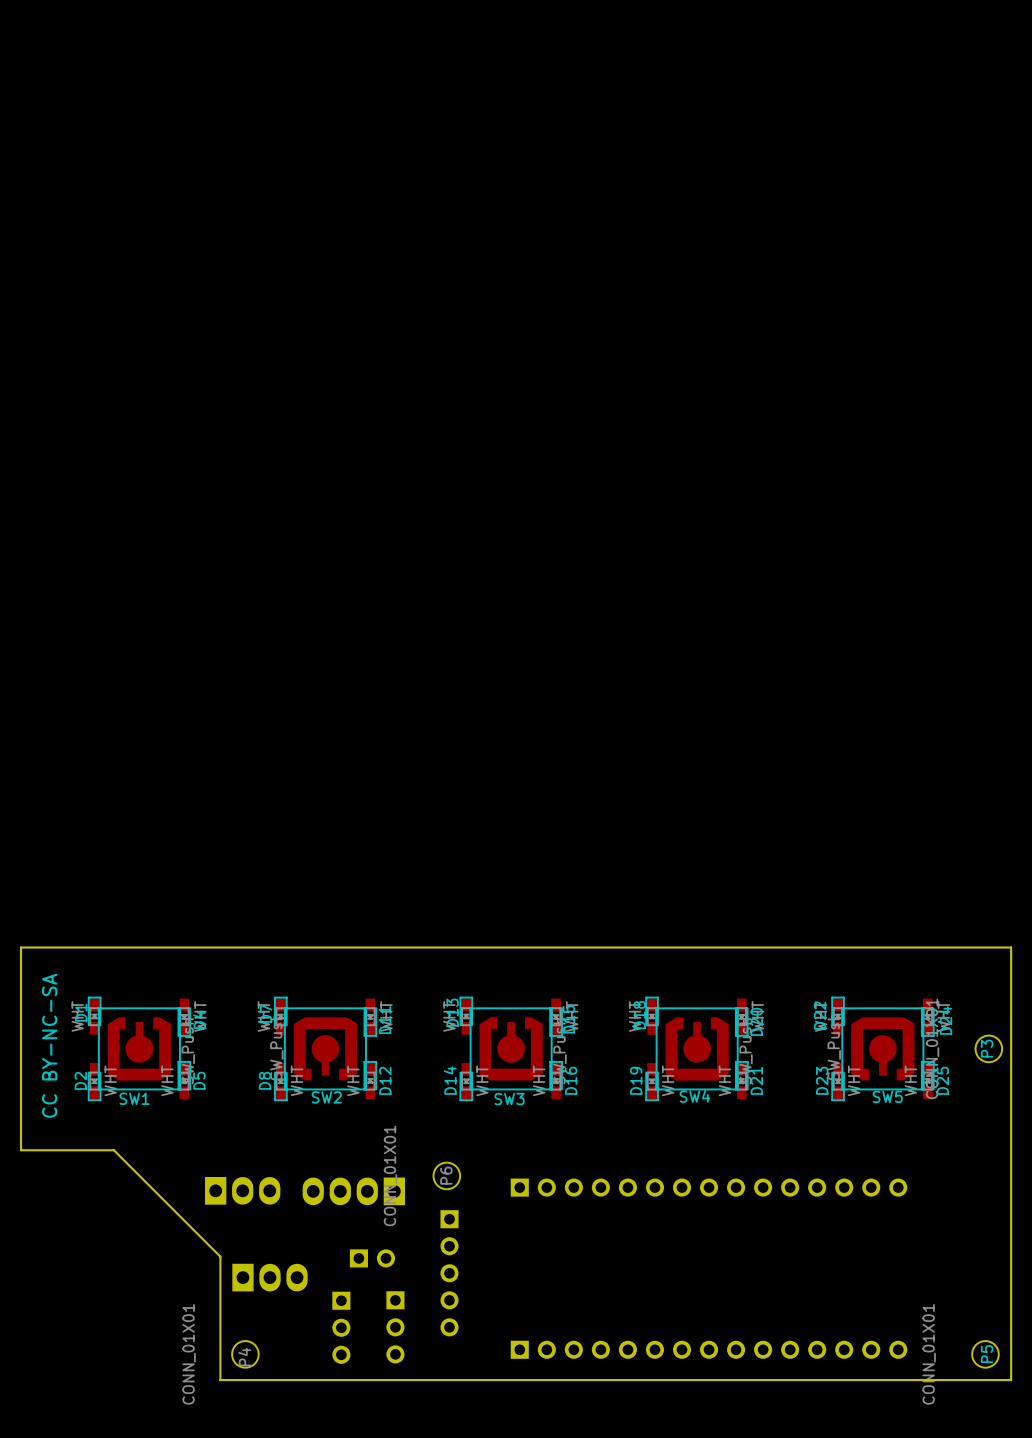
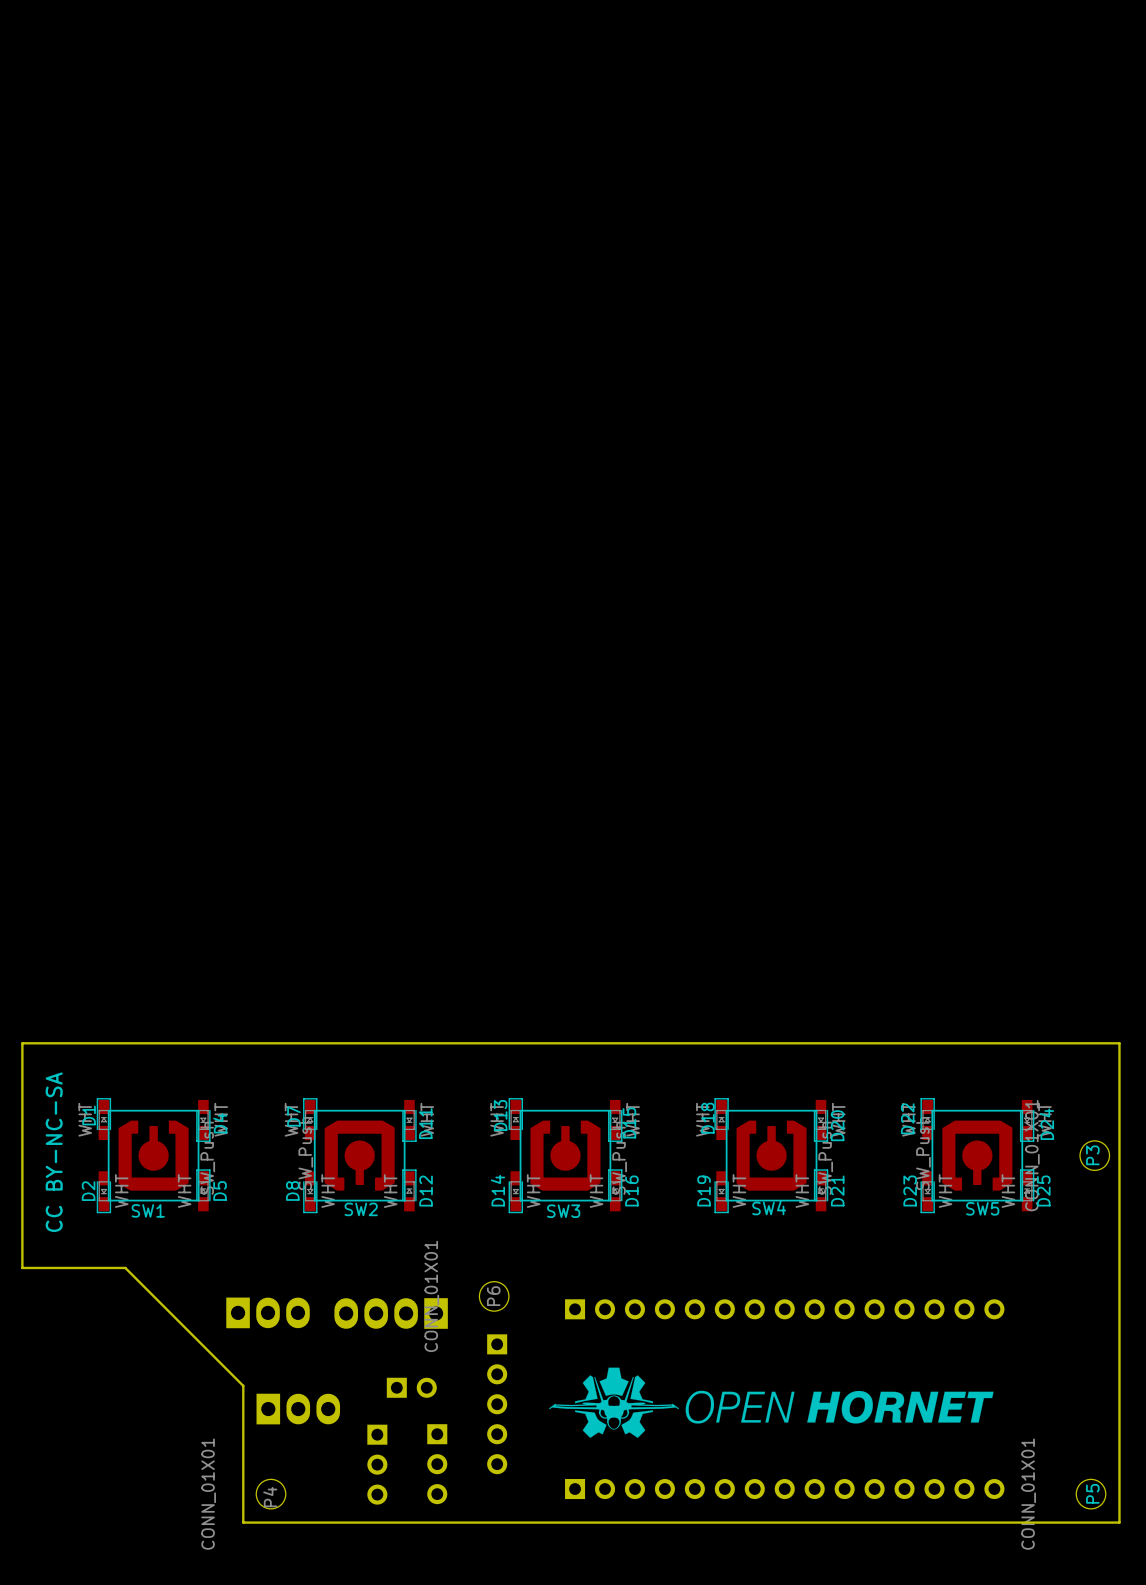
drawing: none -> [549, 1367, 994, 1438]

